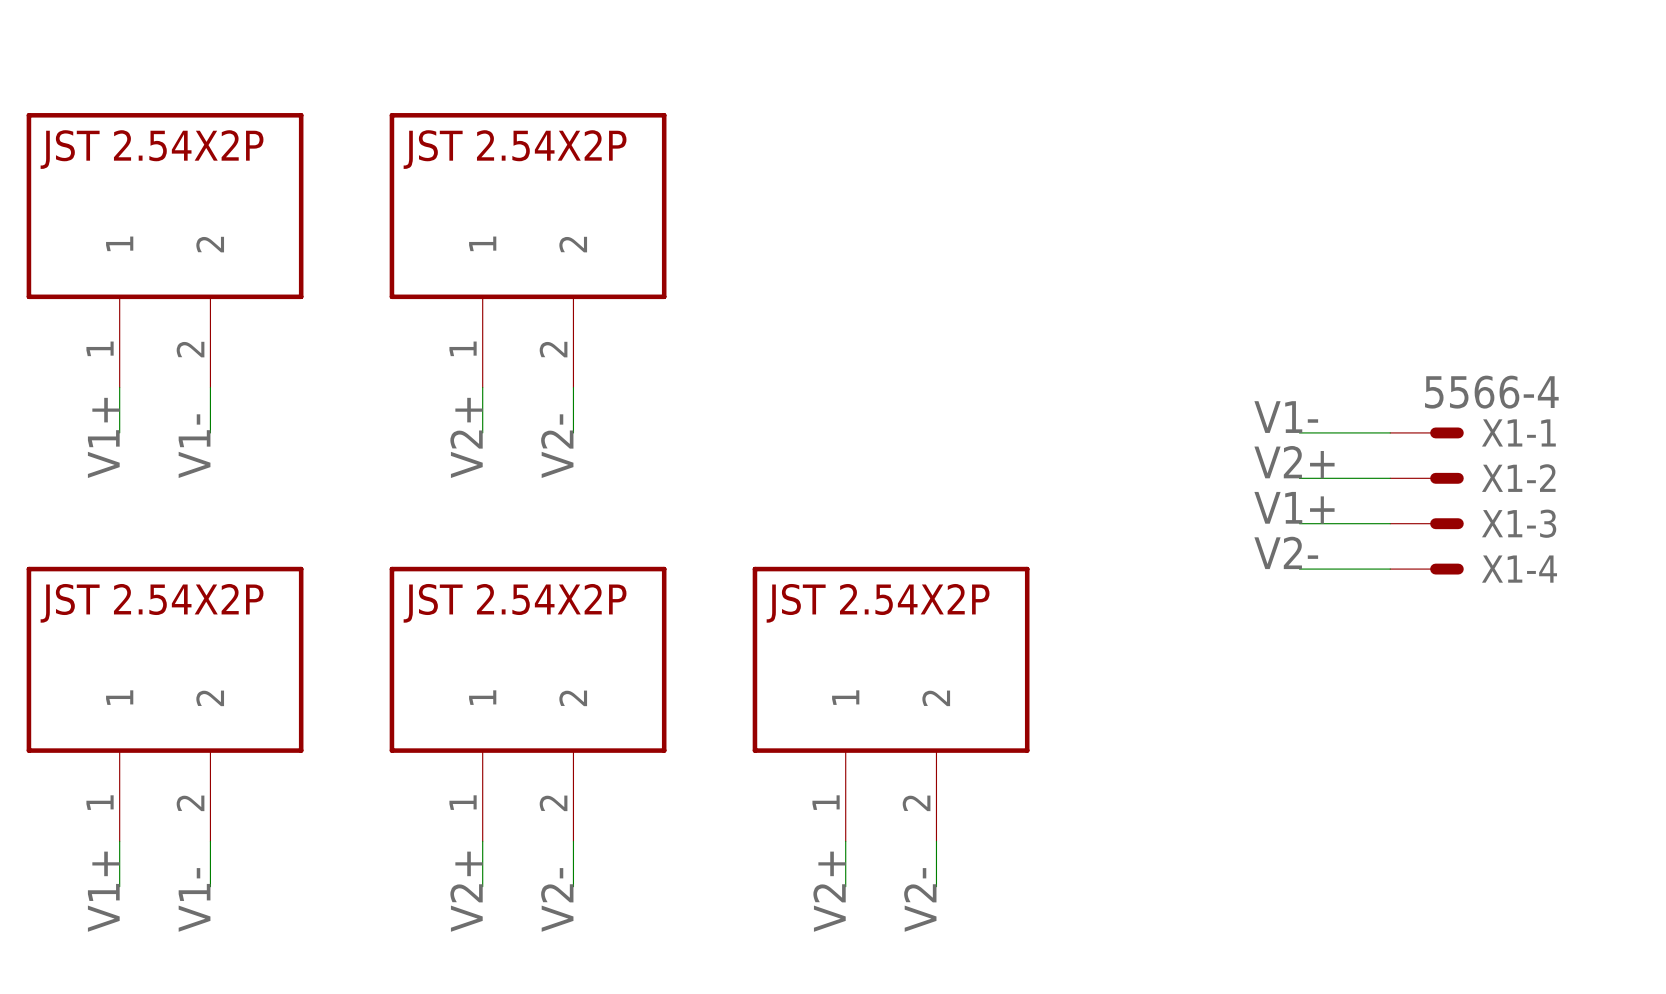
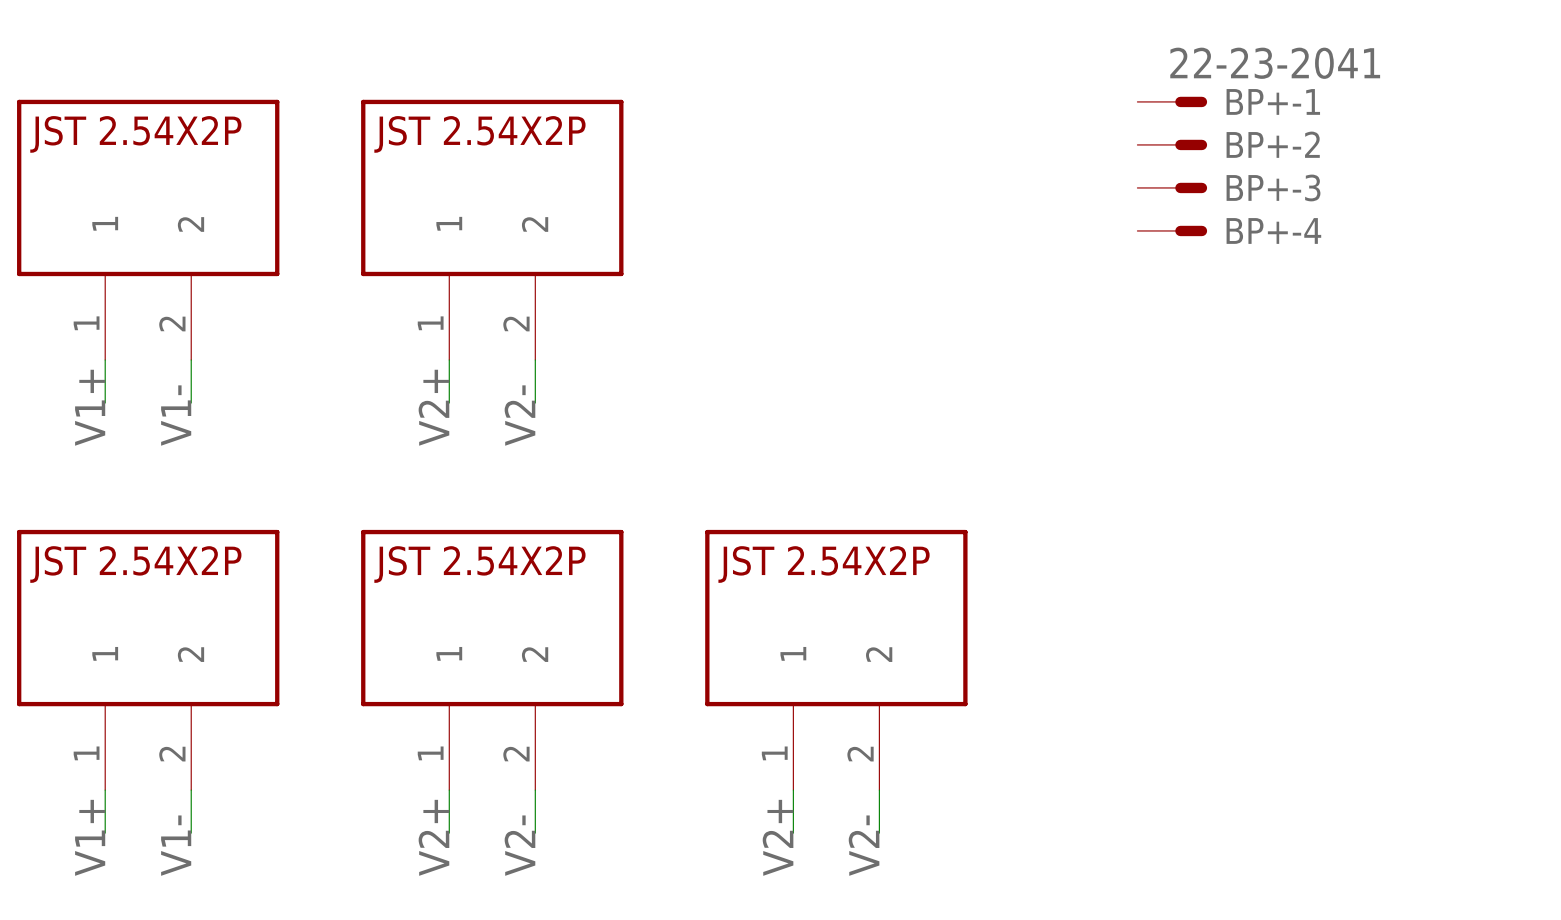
BP+-1: none -> 22-23-2041 (1172, 101)
BP+-2: none -> (1172, 144)
BP+-3: none -> (1172, 187)
BP+-4: none -> (1172, 230)
label: V1- (1286, 417) -> none
wire: (1299, 432) (1390, 432) -> none
X1-1: 5566-4 (1426, 432) -> none
label: V2+ (1294, 462) -> none
wire: (1299, 478) (1390, 478) -> none
X1-2: (1426, 478) -> none
label: V1+ (1294, 507) -> none
wire: (1299, 523) (1390, 523) -> none
X1-3: (1426, 523) -> none
label: V2- (1286, 552) -> none
wire: (1299, 569) (1390, 569) -> none
X1-4: (1426, 569) -> none

